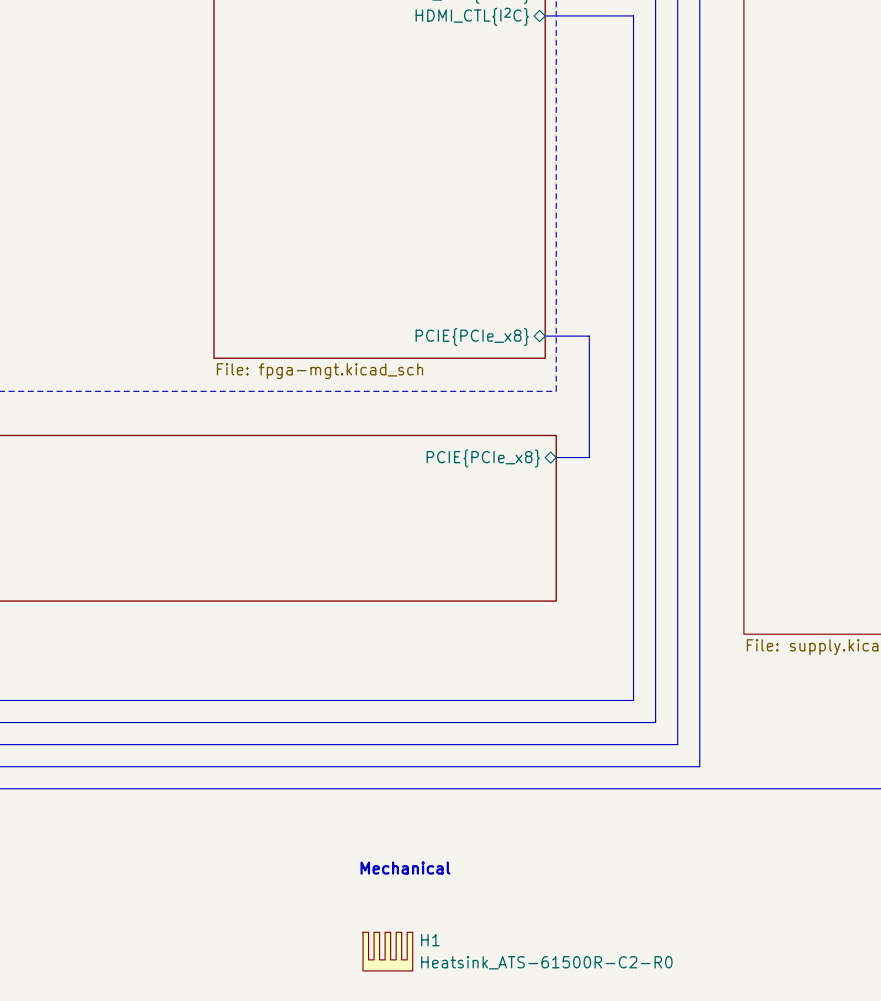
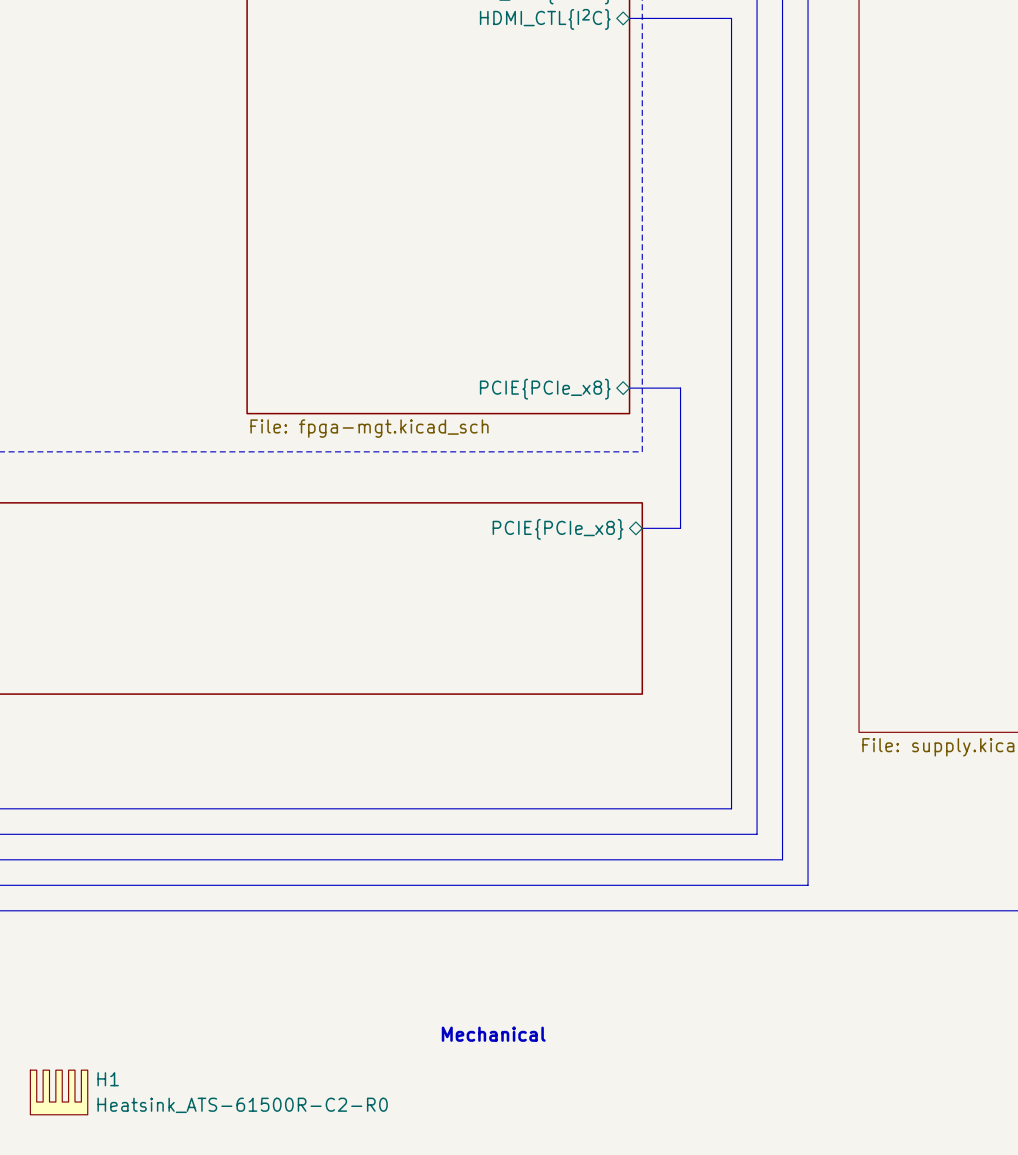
text position: Mechanical (405, 868) -> Mechanical (493, 1034)
H1 position: (387, 951) -> (59, 1092)

